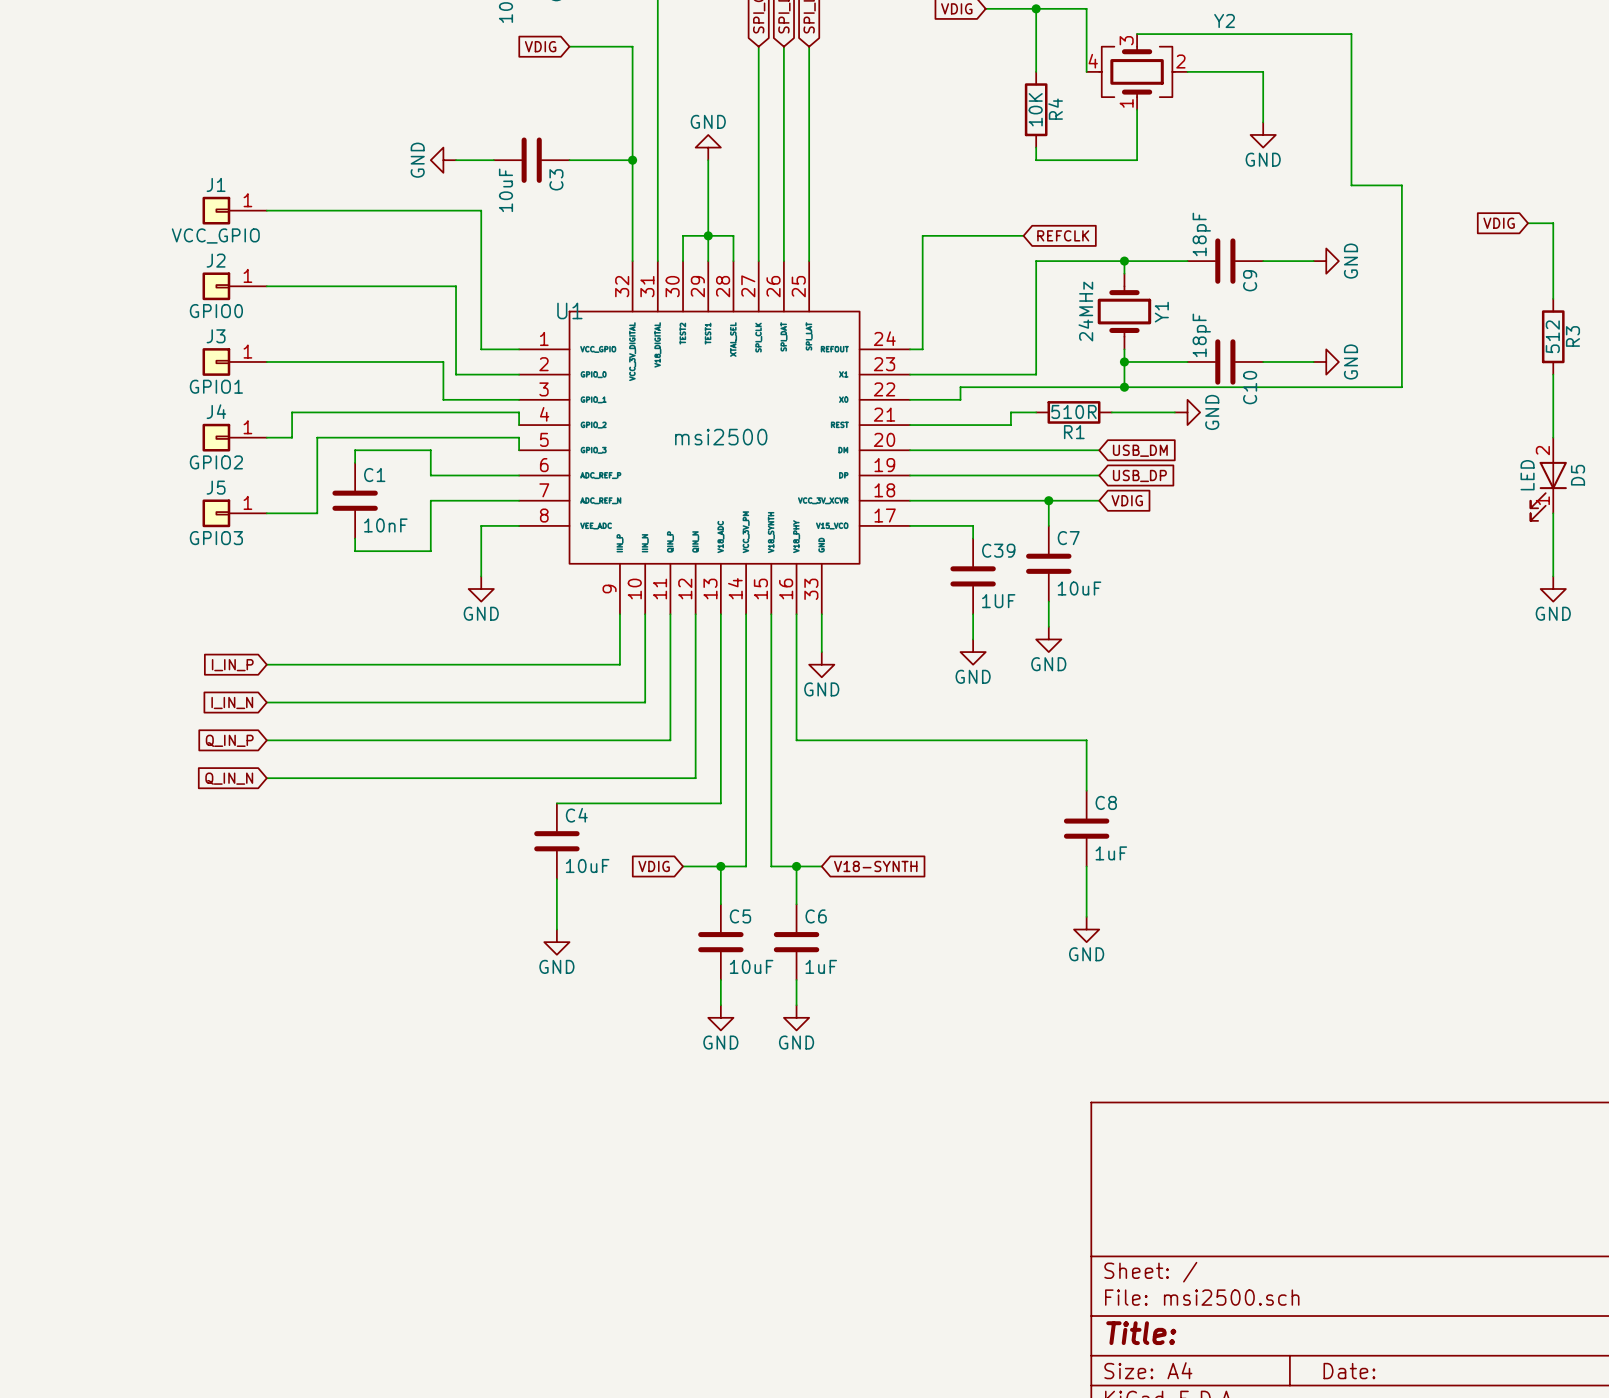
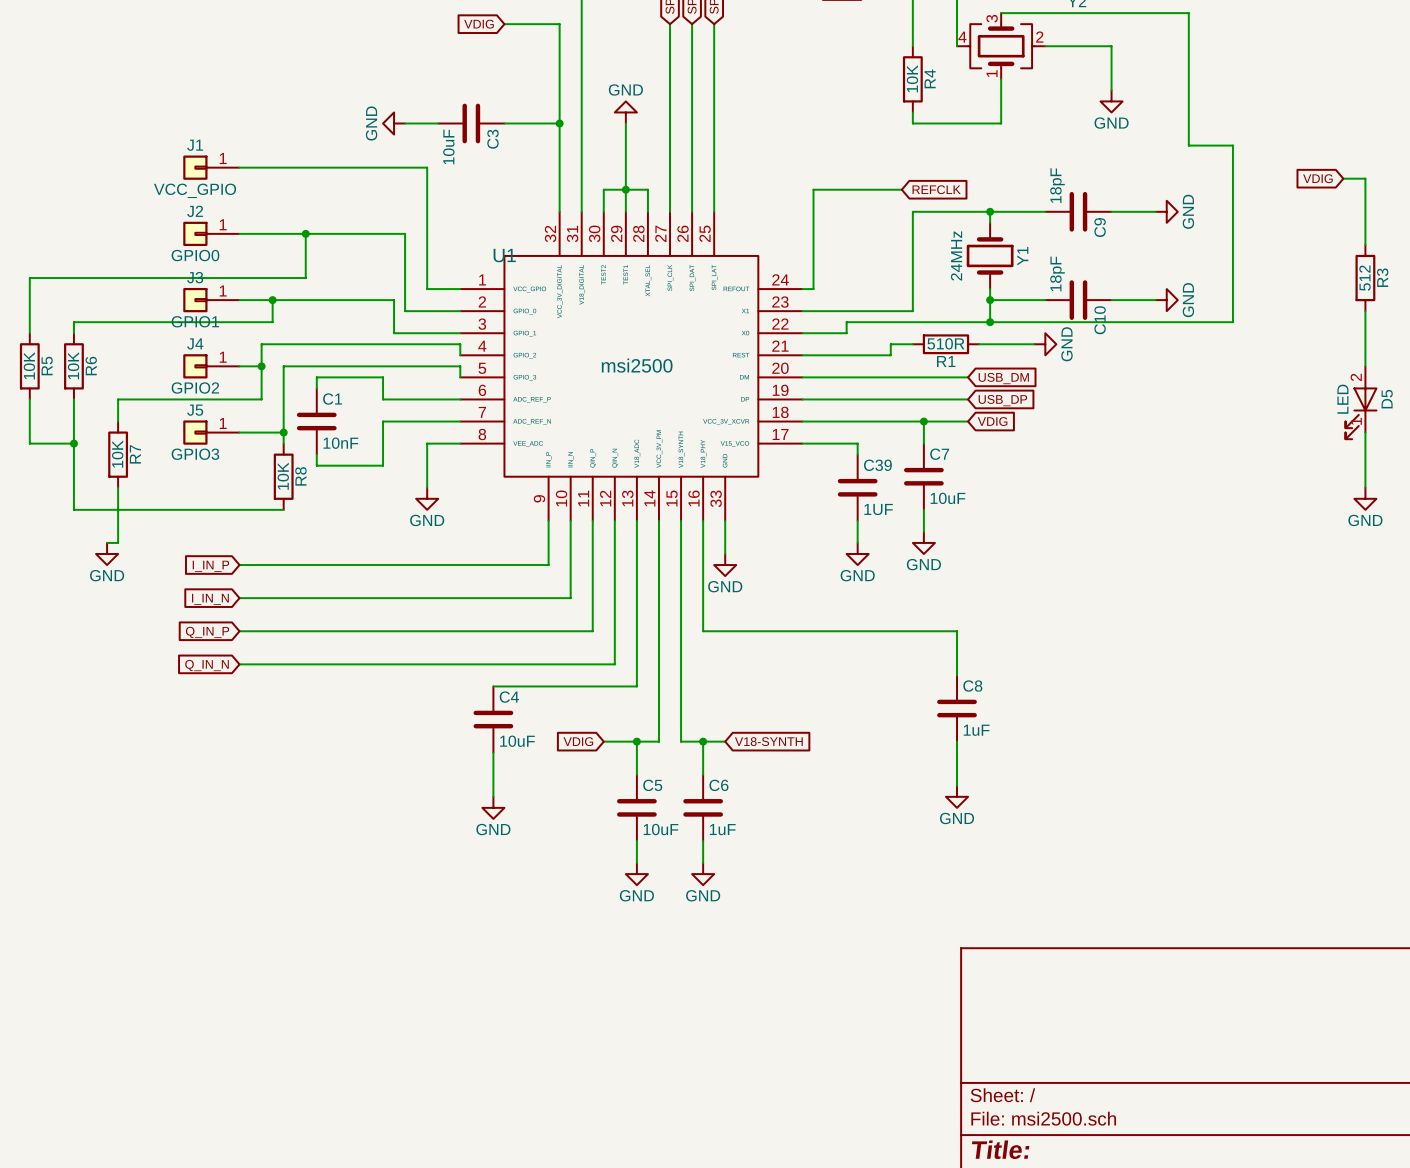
wire: none -> (305, 233) (305, 278) (29, 278) (29, 333)
junction: none -> (305, 233)
wire: none -> (272, 300) (272, 322) (73, 322) (73, 333)
junction: none -> (272, 300)
R5: none -> 10K (29, 366)
R6: none -> 10K (73, 366)
wire: none -> (261, 366) (261, 399) (118, 399) (118, 421)
junction: none -> (261, 366)
wire: none -> (29, 399) (29, 443) (73, 443)
wire: none -> (73, 399) (73, 509) (283, 509)
wire: none -> (283, 432) (283, 443)
junction: none -> (283, 432)
junction: none -> (73, 443)
R7: none -> 10K (118, 454)
R8: none -> 10K (283, 476)
wire: none -> (118, 487) (118, 542) (107, 542)
power symbol: none -> GND (107, 553)

